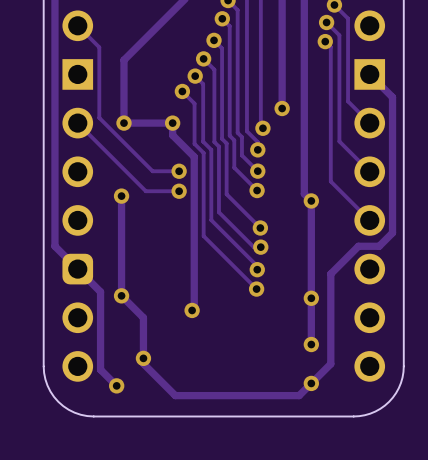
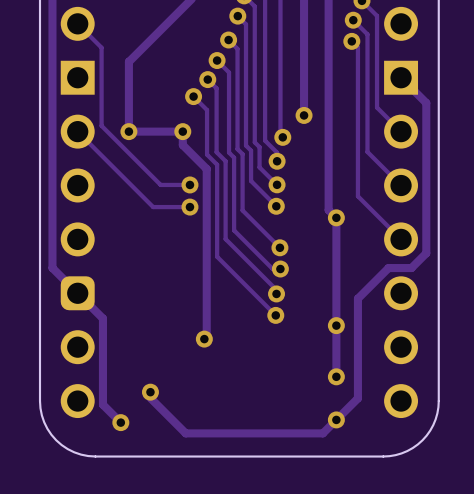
track: (121, 196) (121, 295) (143, 317) (143, 363) -> none
via: (121, 196) -> none
via: (121, 295) -> none

